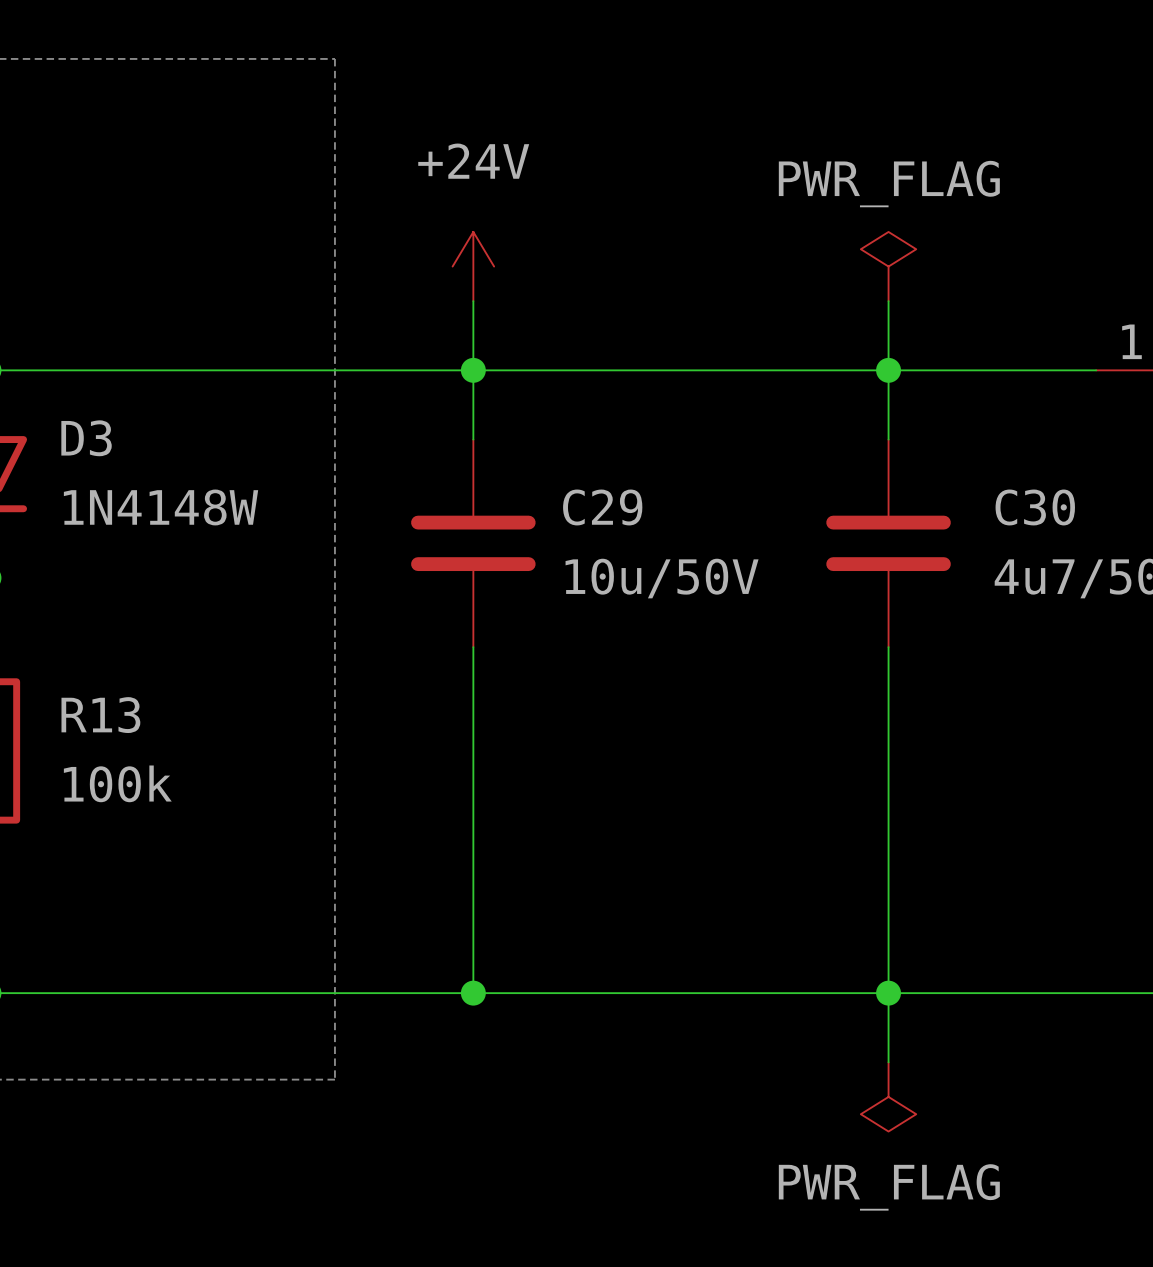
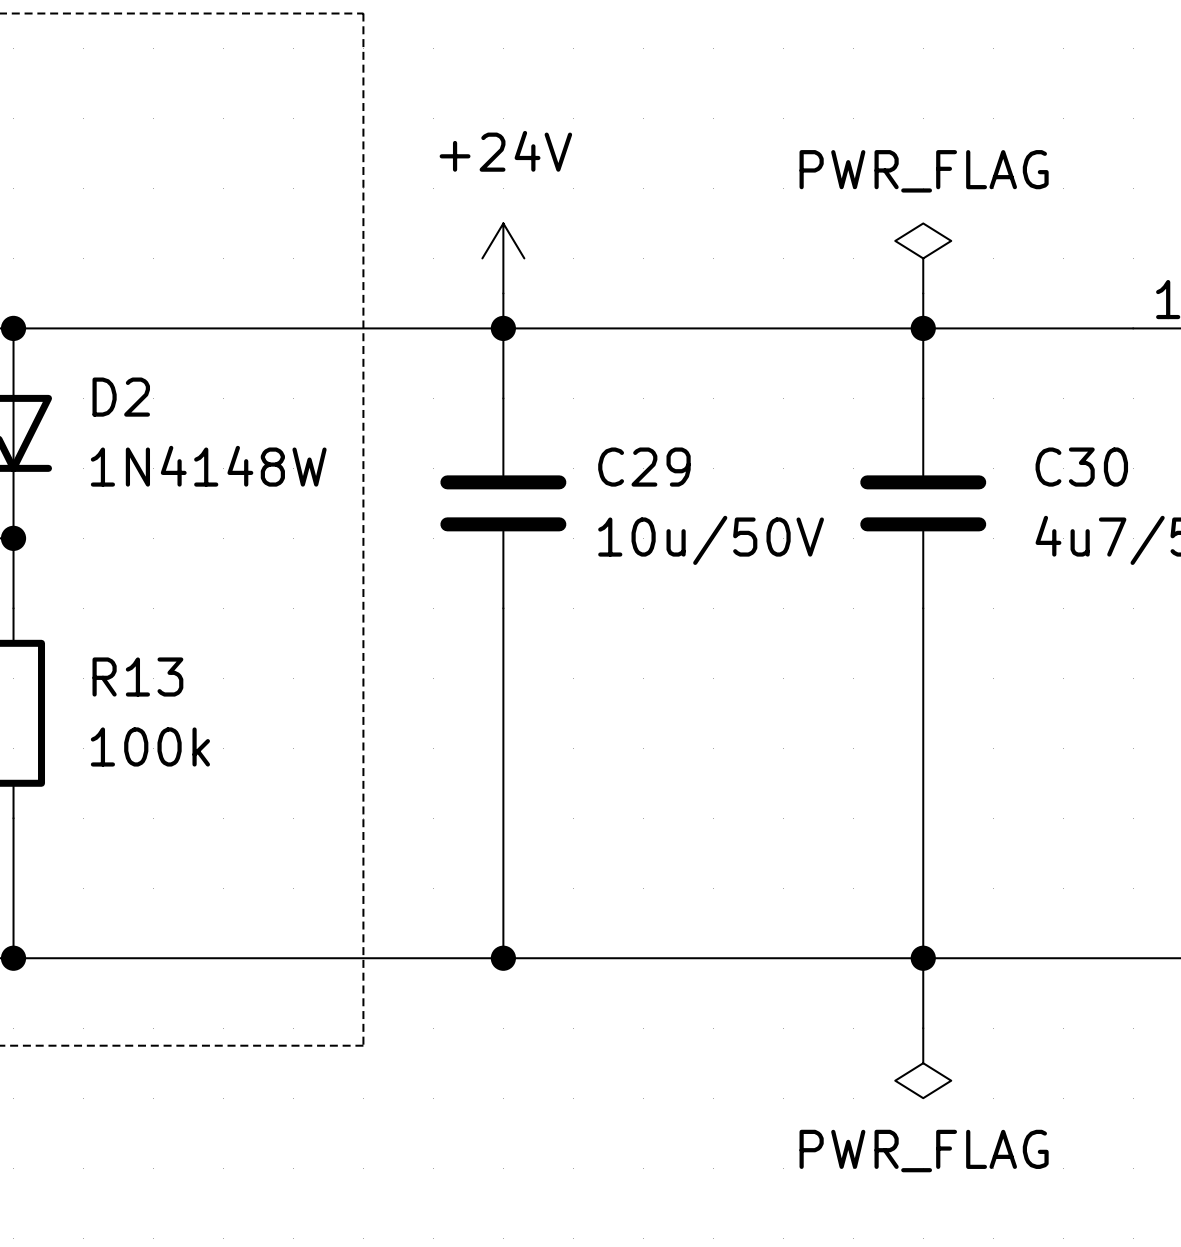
power symbol position: +24V (473, 266) -> +24V (503, 258)
power symbol position: PWR_FLAG (888, 266) -> PWR_FLAG (923, 258)
D3 name: D3 (86, 438) -> D2 (121, 397)

